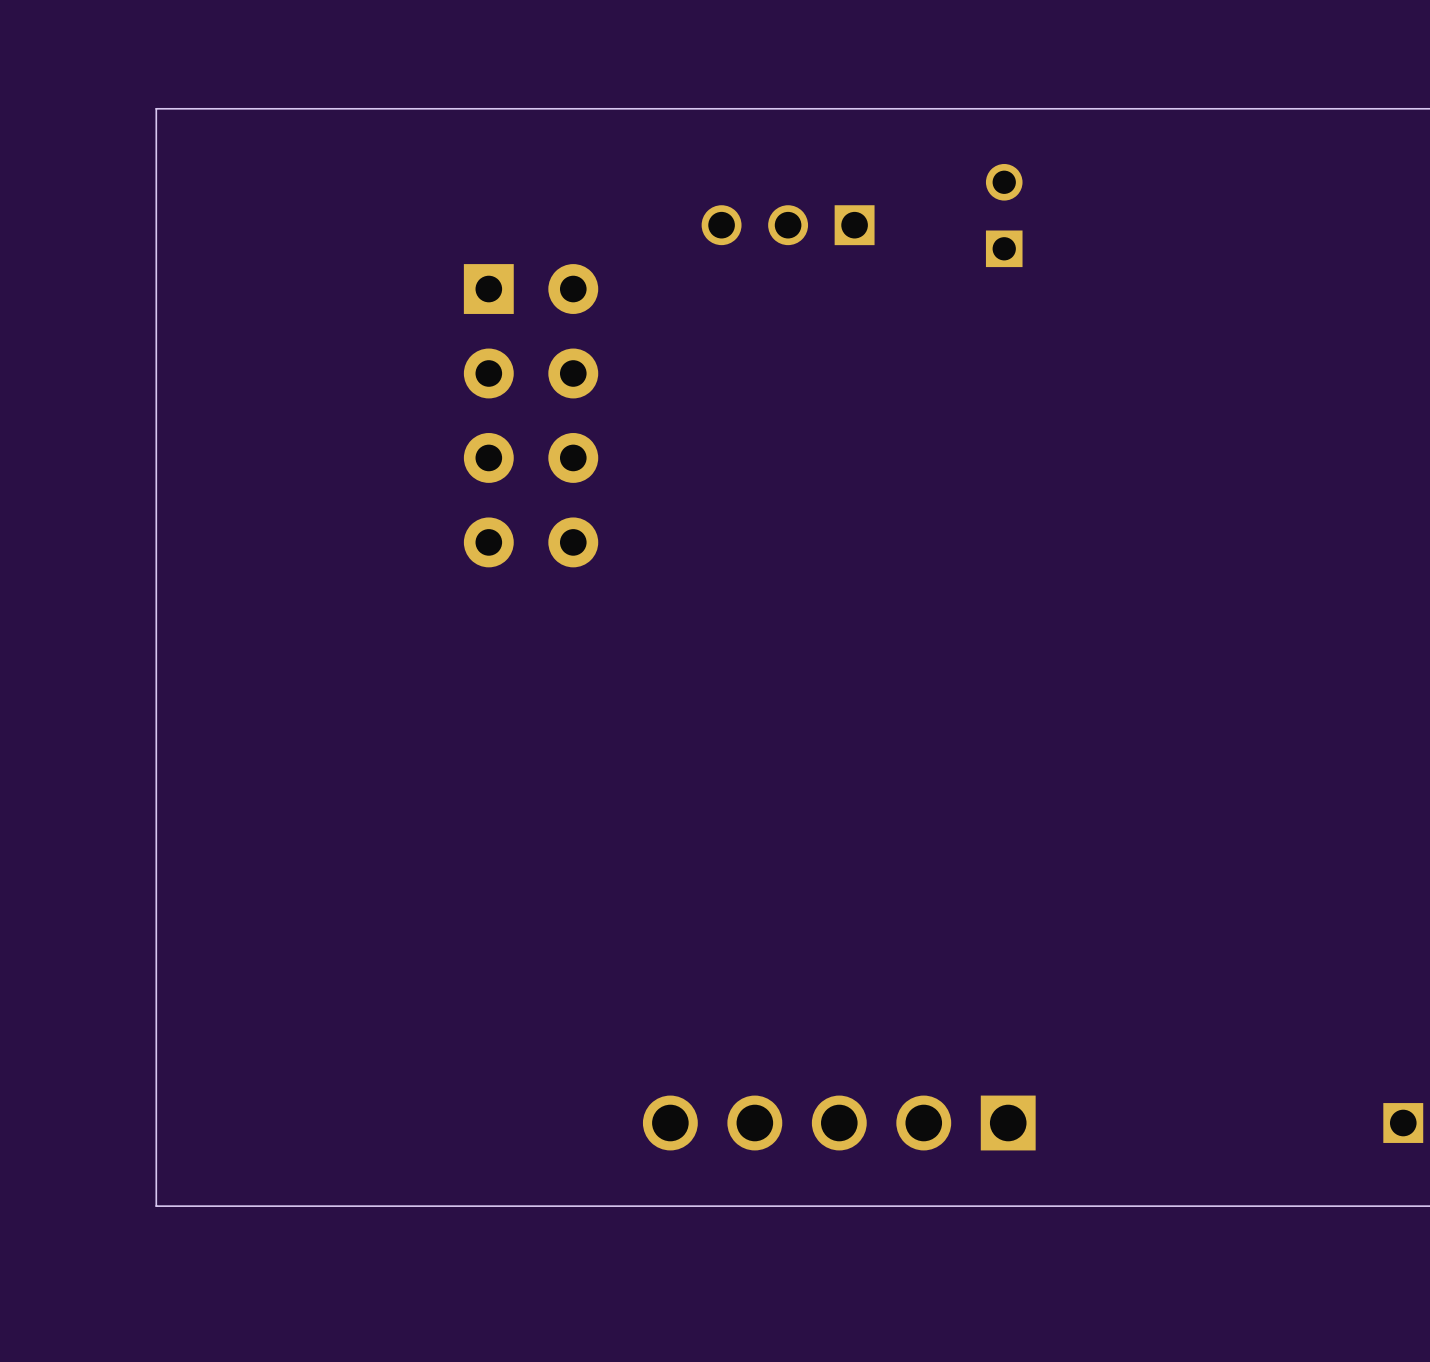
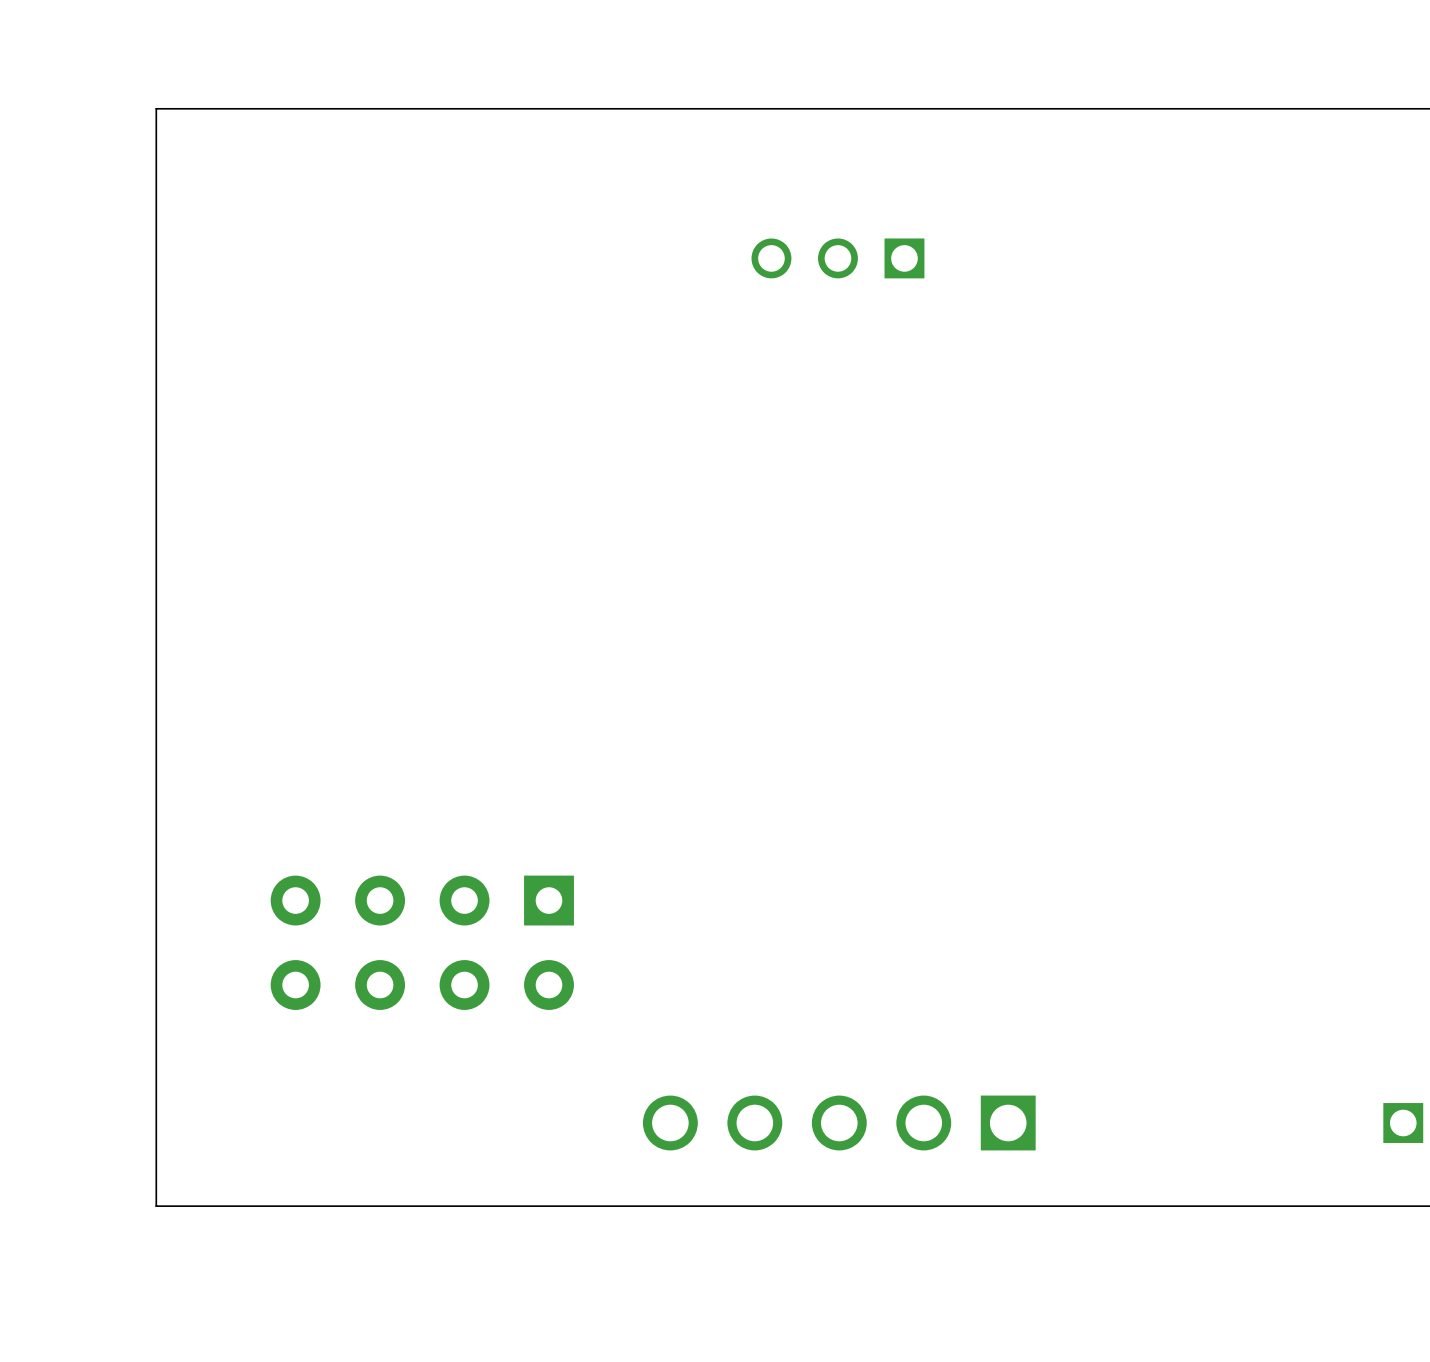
part: (1004, 215) -> none
part position: (788, 225) -> (837, 258)
part rotation: 0° (531, 415) -> 90° clockwise (422, 942)
part position: (531, 415) -> (422, 942)

